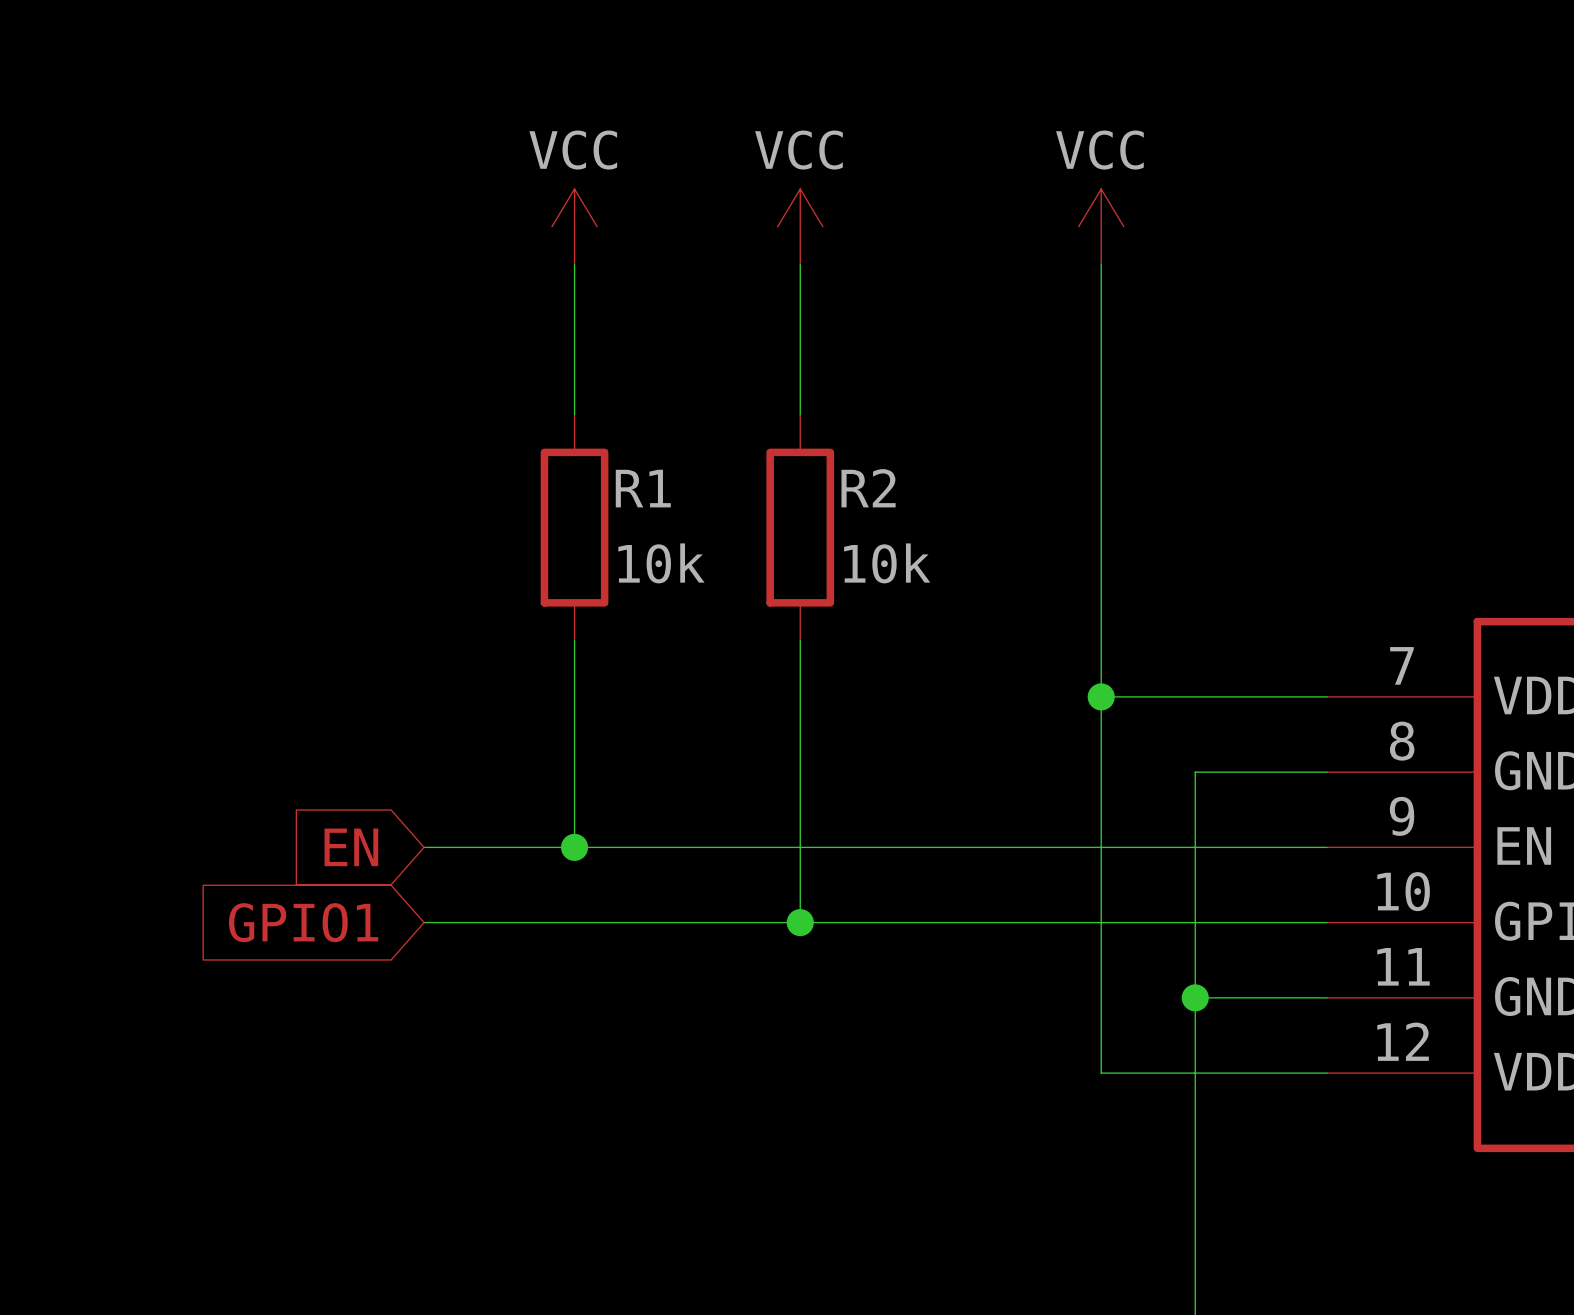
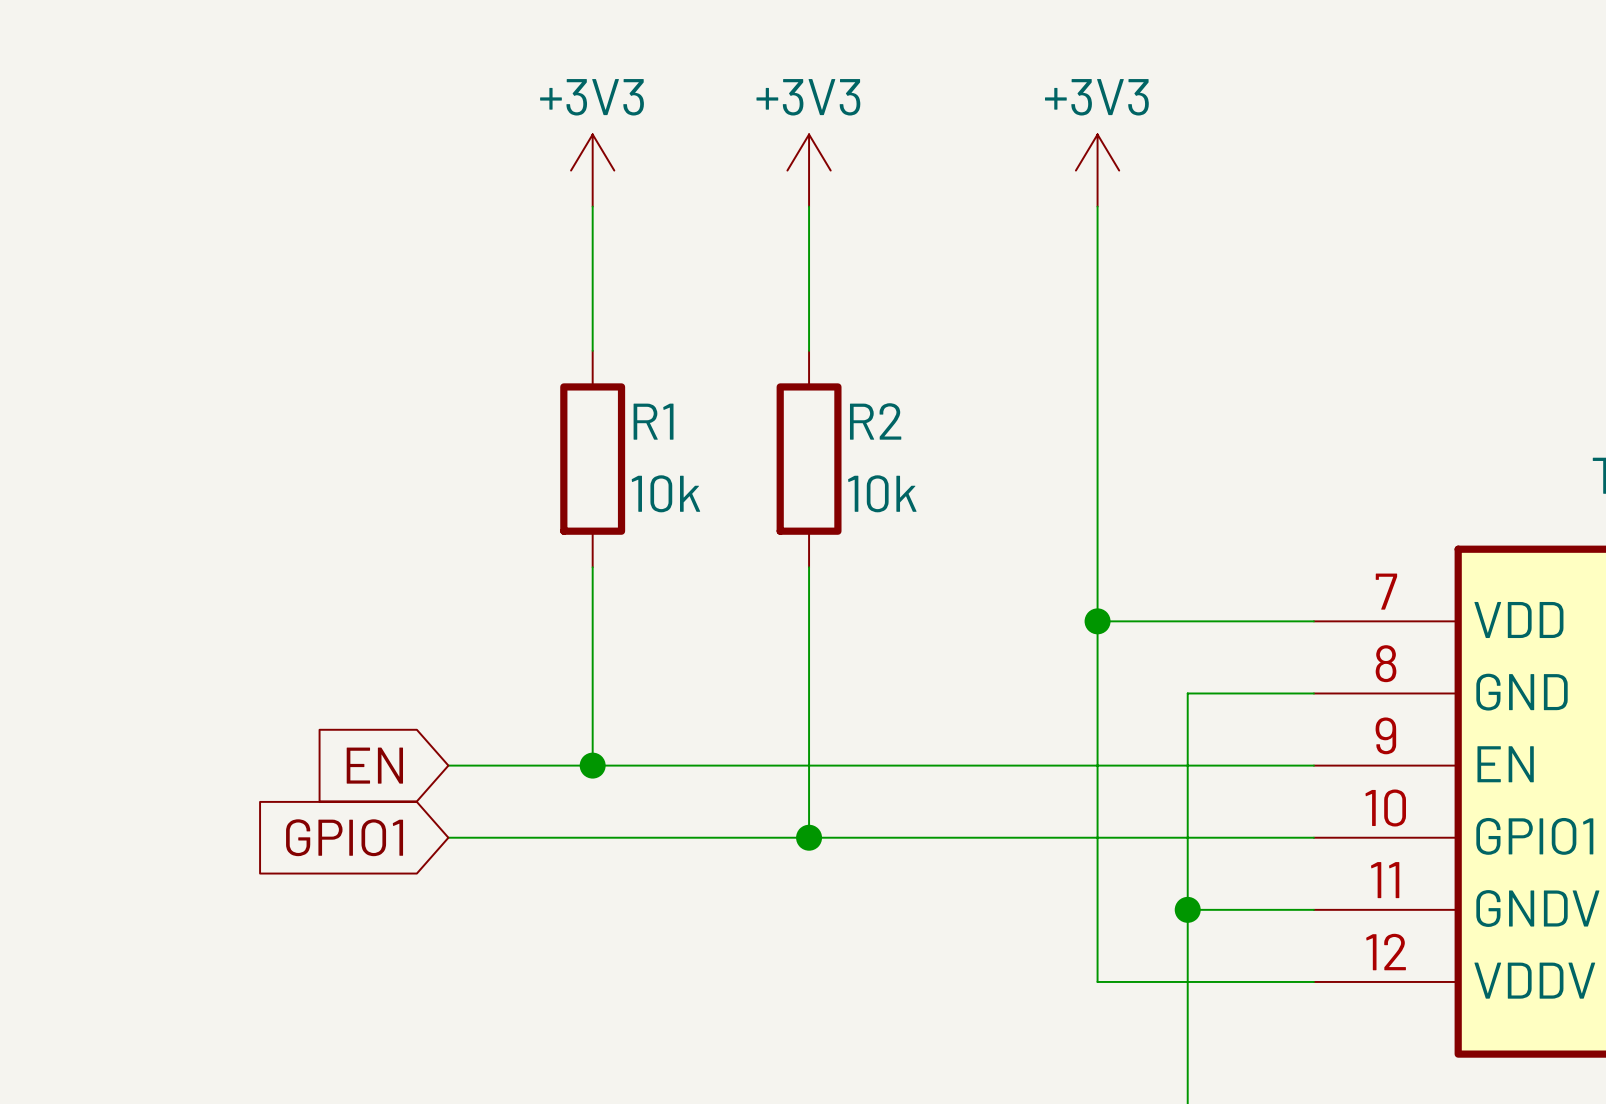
power symbol: VCC (574, 226) -> +3V3 (592, 170)
power symbol: VCC (800, 226) -> +3V3 (809, 170)
power symbol: VCC (1101, 226) -> +3V3 (1097, 170)

